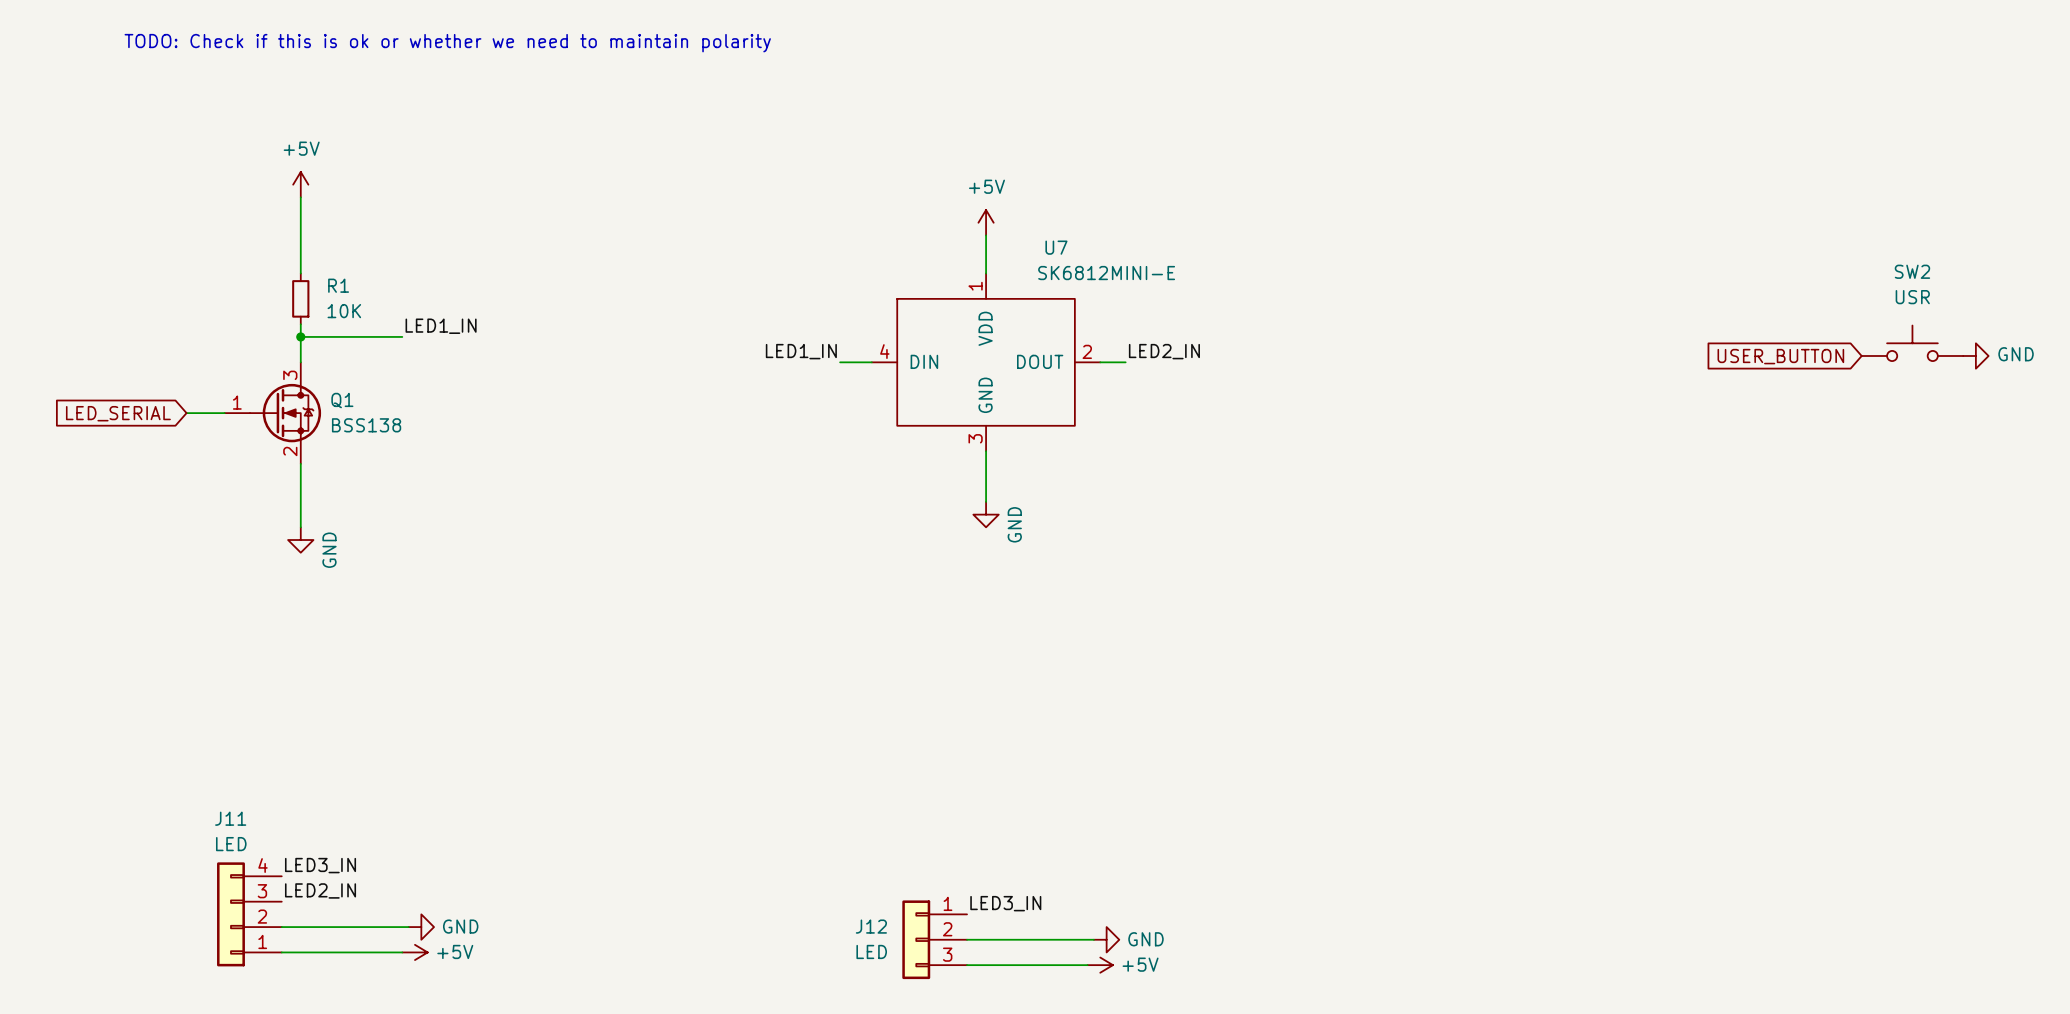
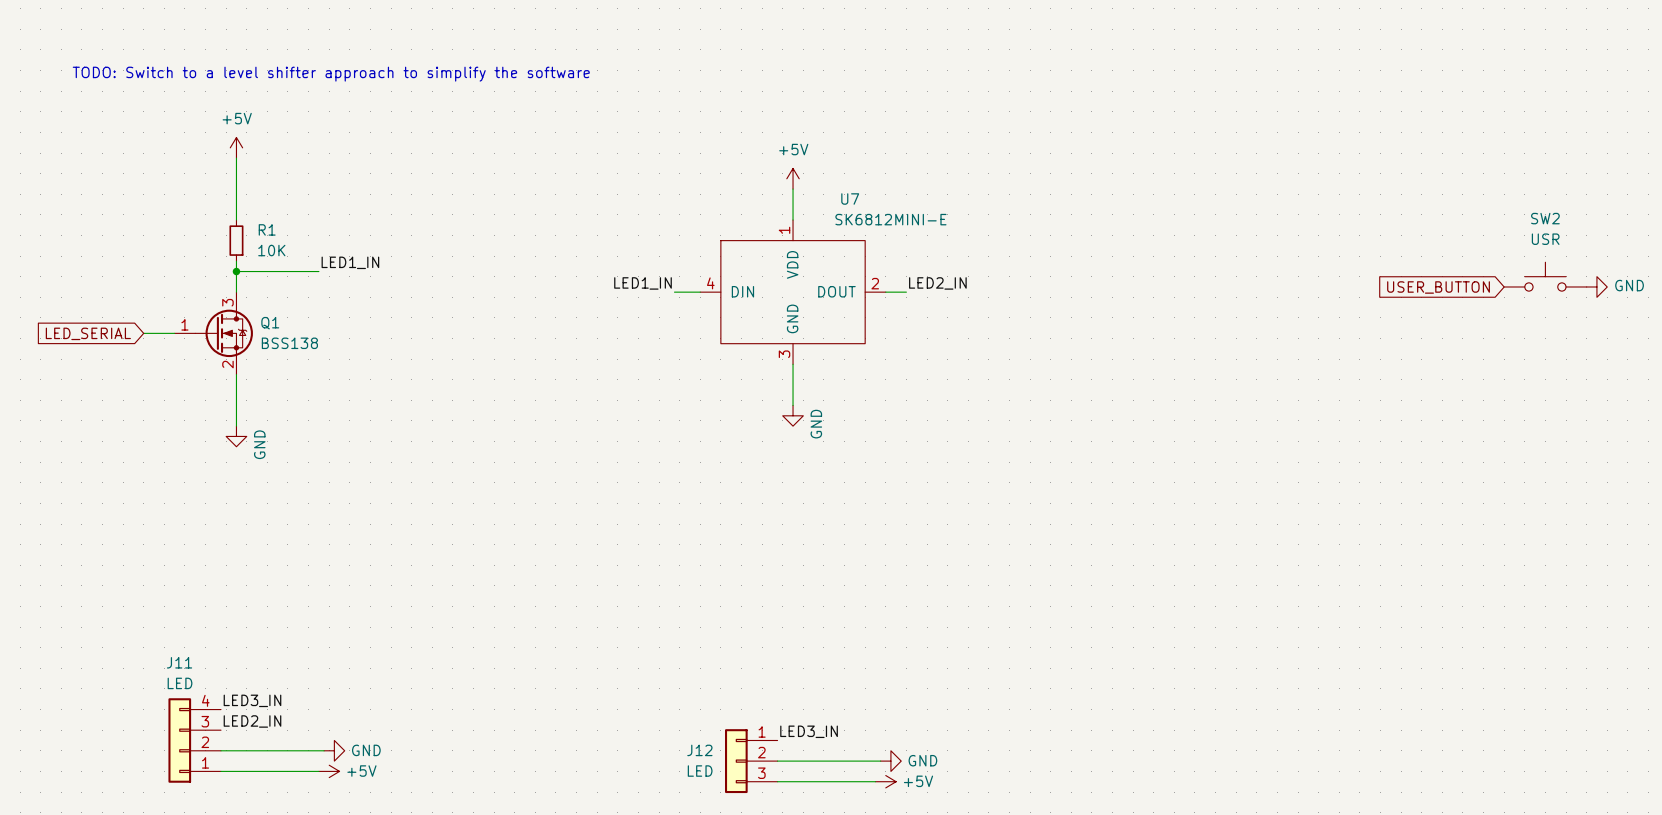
text: TODO: Check if this is ok or whether we need to maintain polarity (447, 43) -> none
text: none -> TODO: Switch to a level shifter approach to simplify the software (331, 74)

